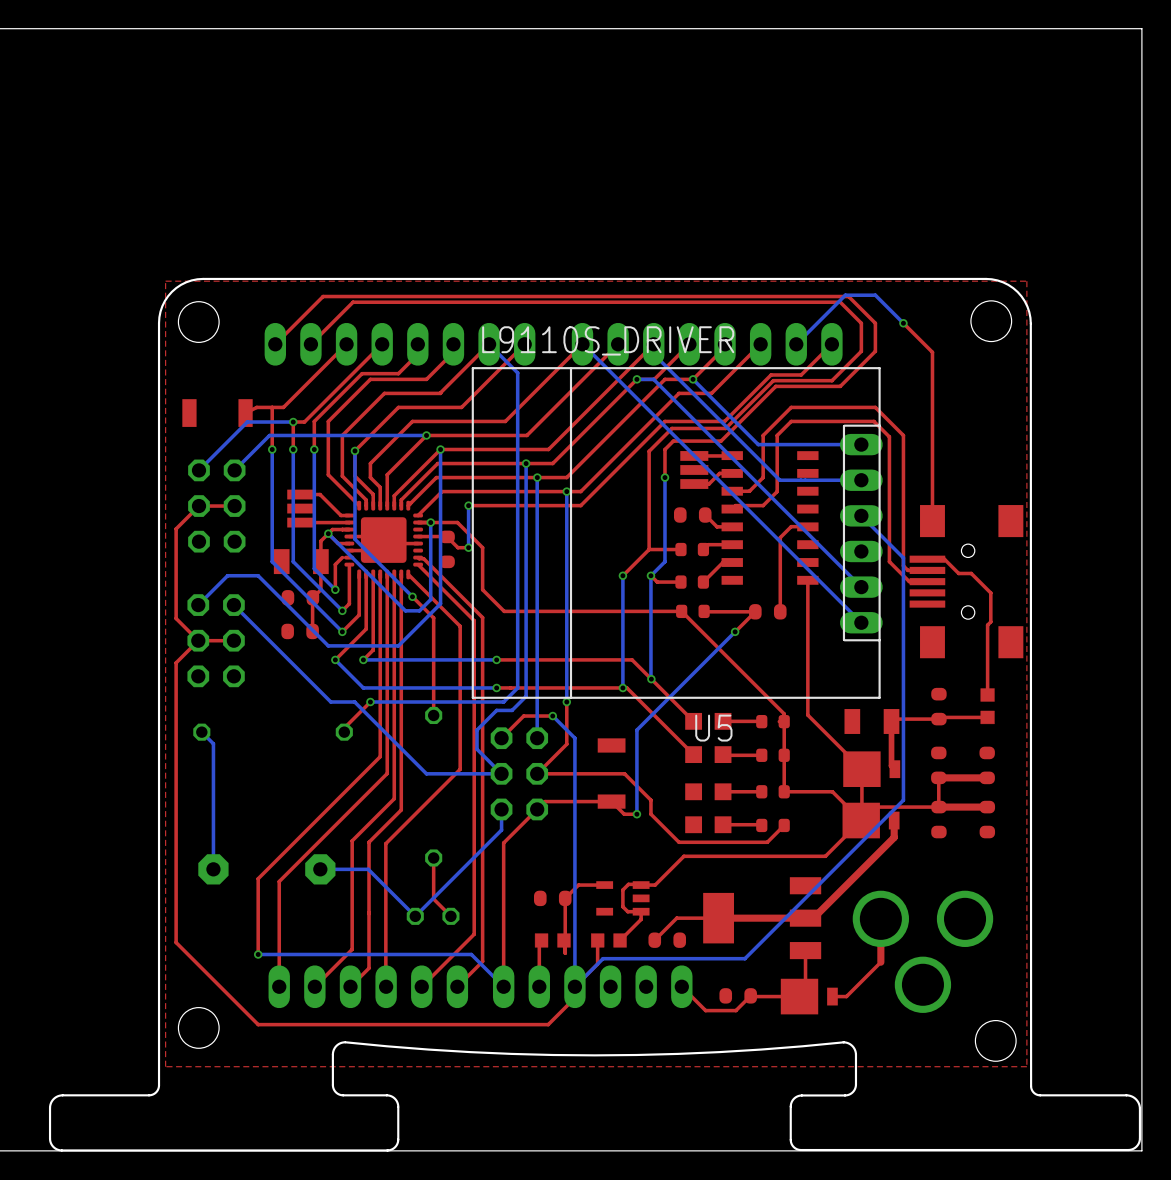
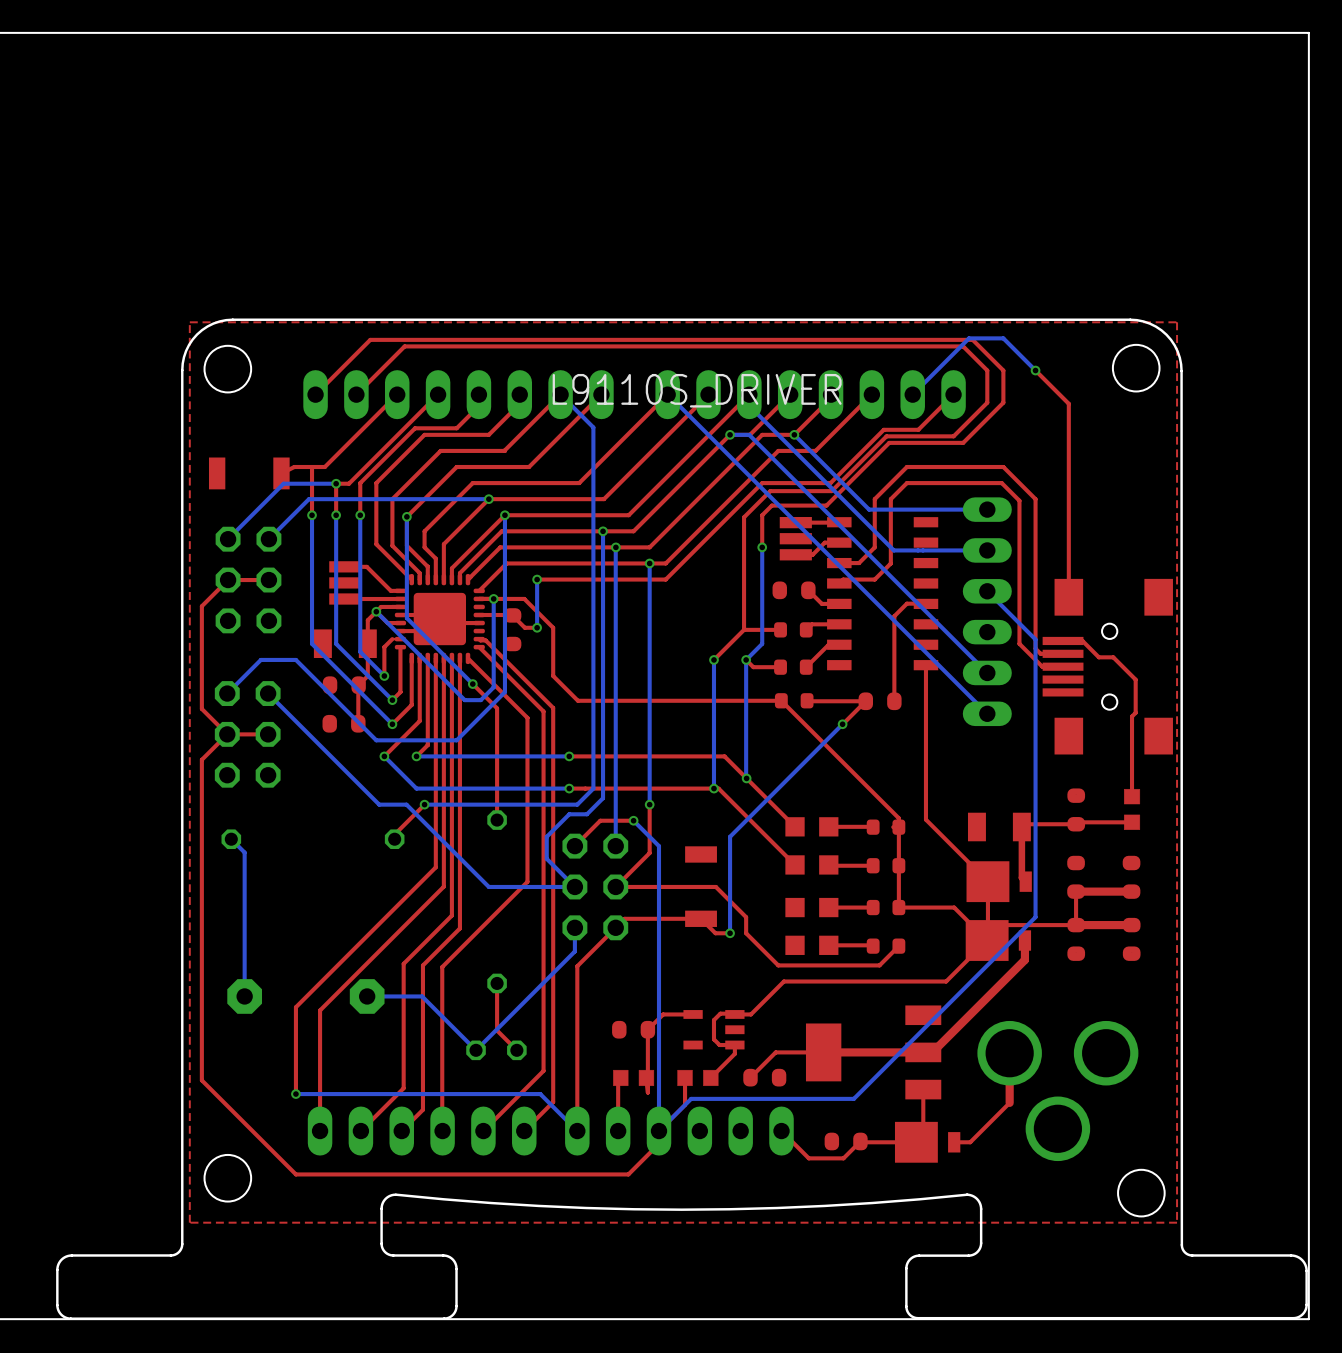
U5: L9110S_DRIVER (676, 532) -> none

